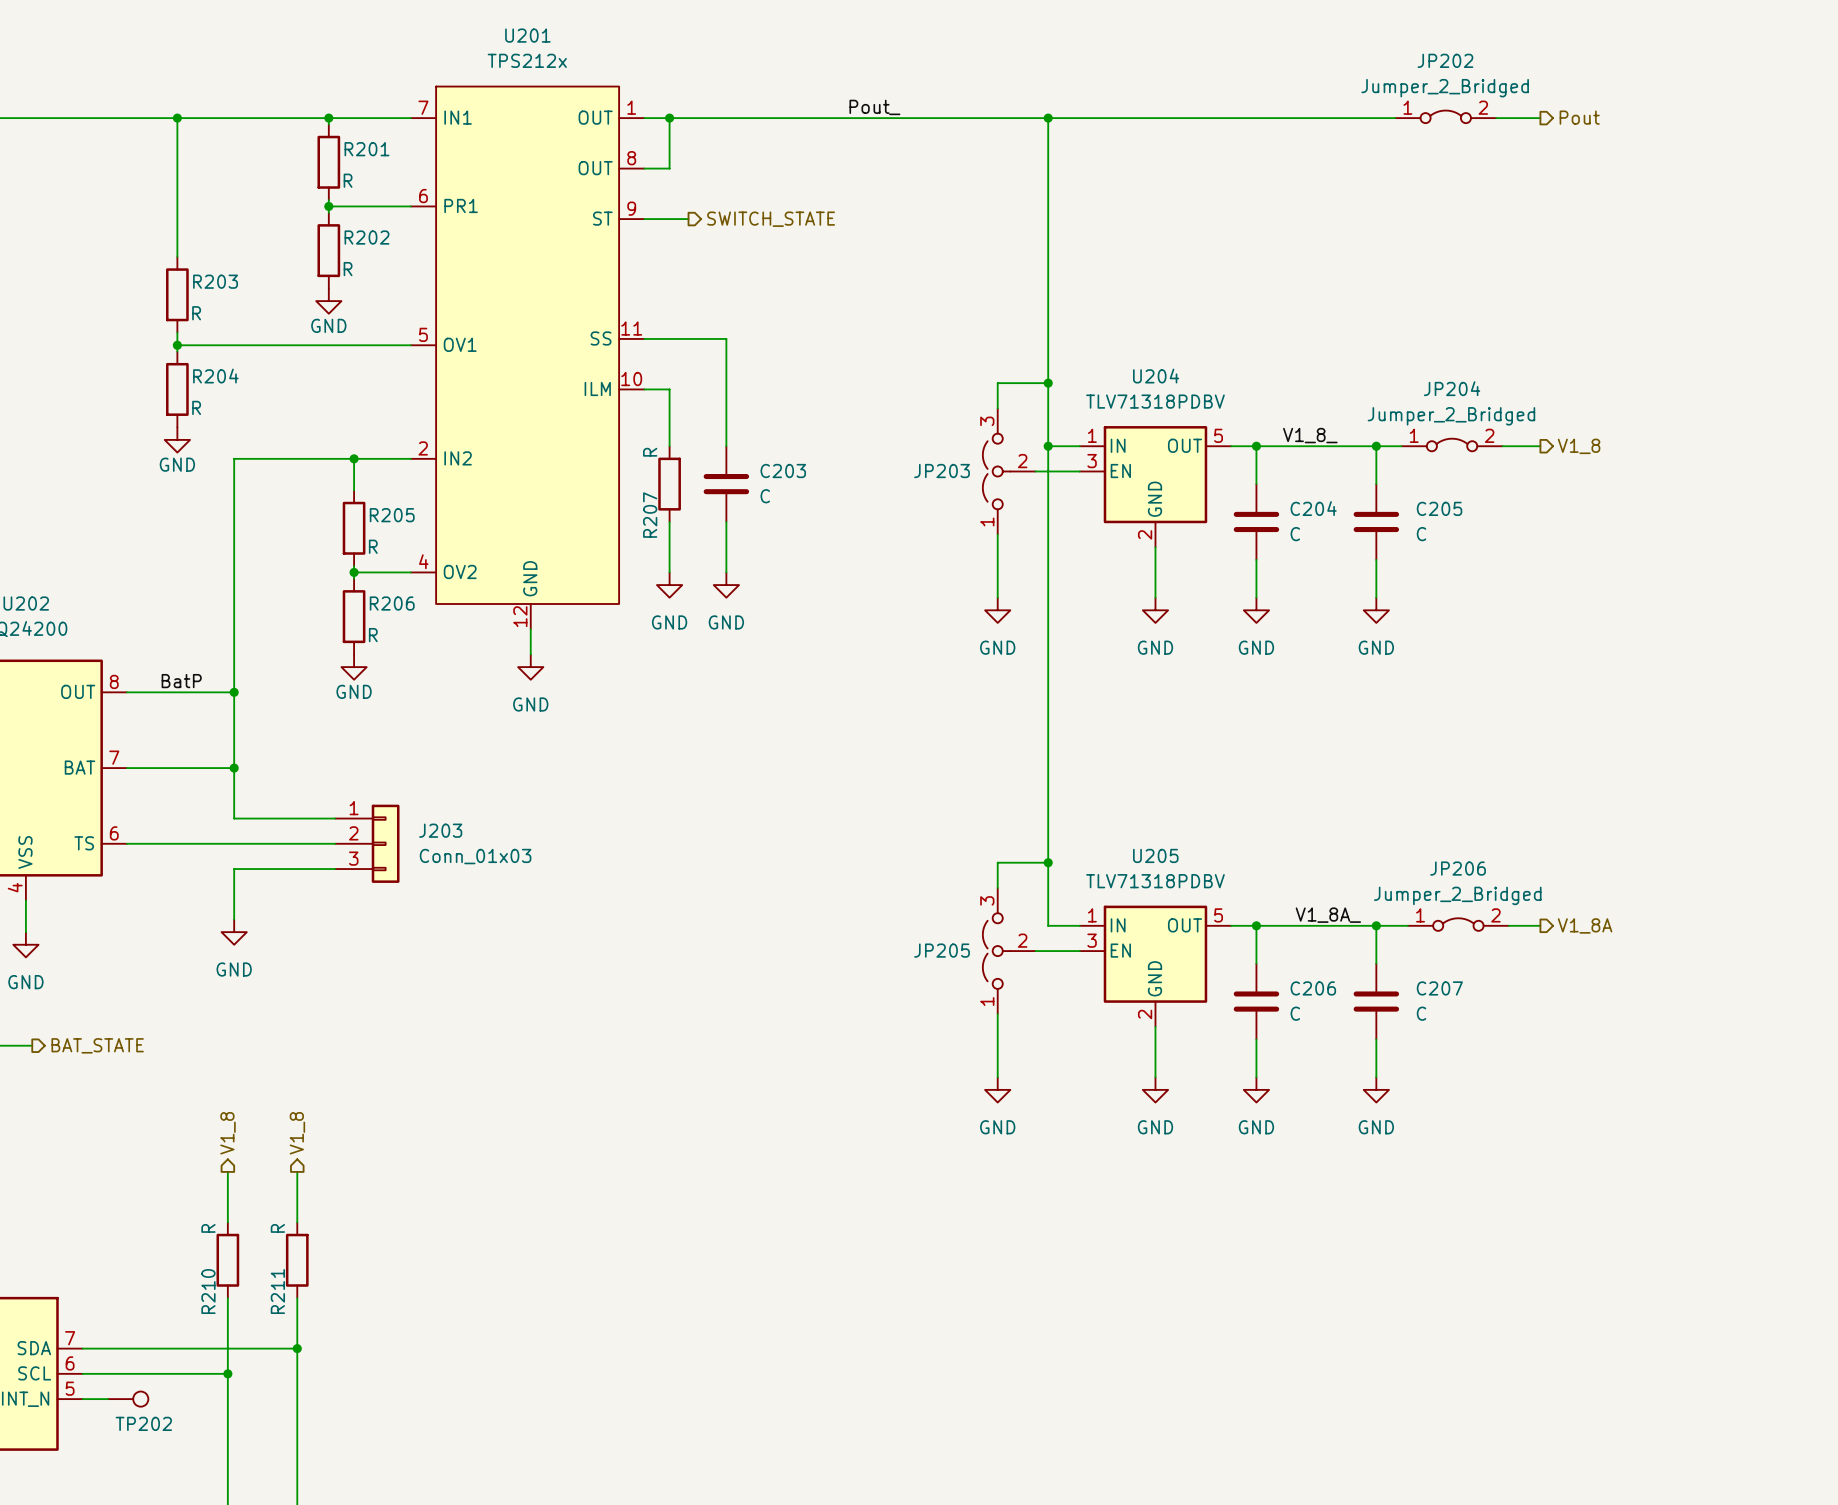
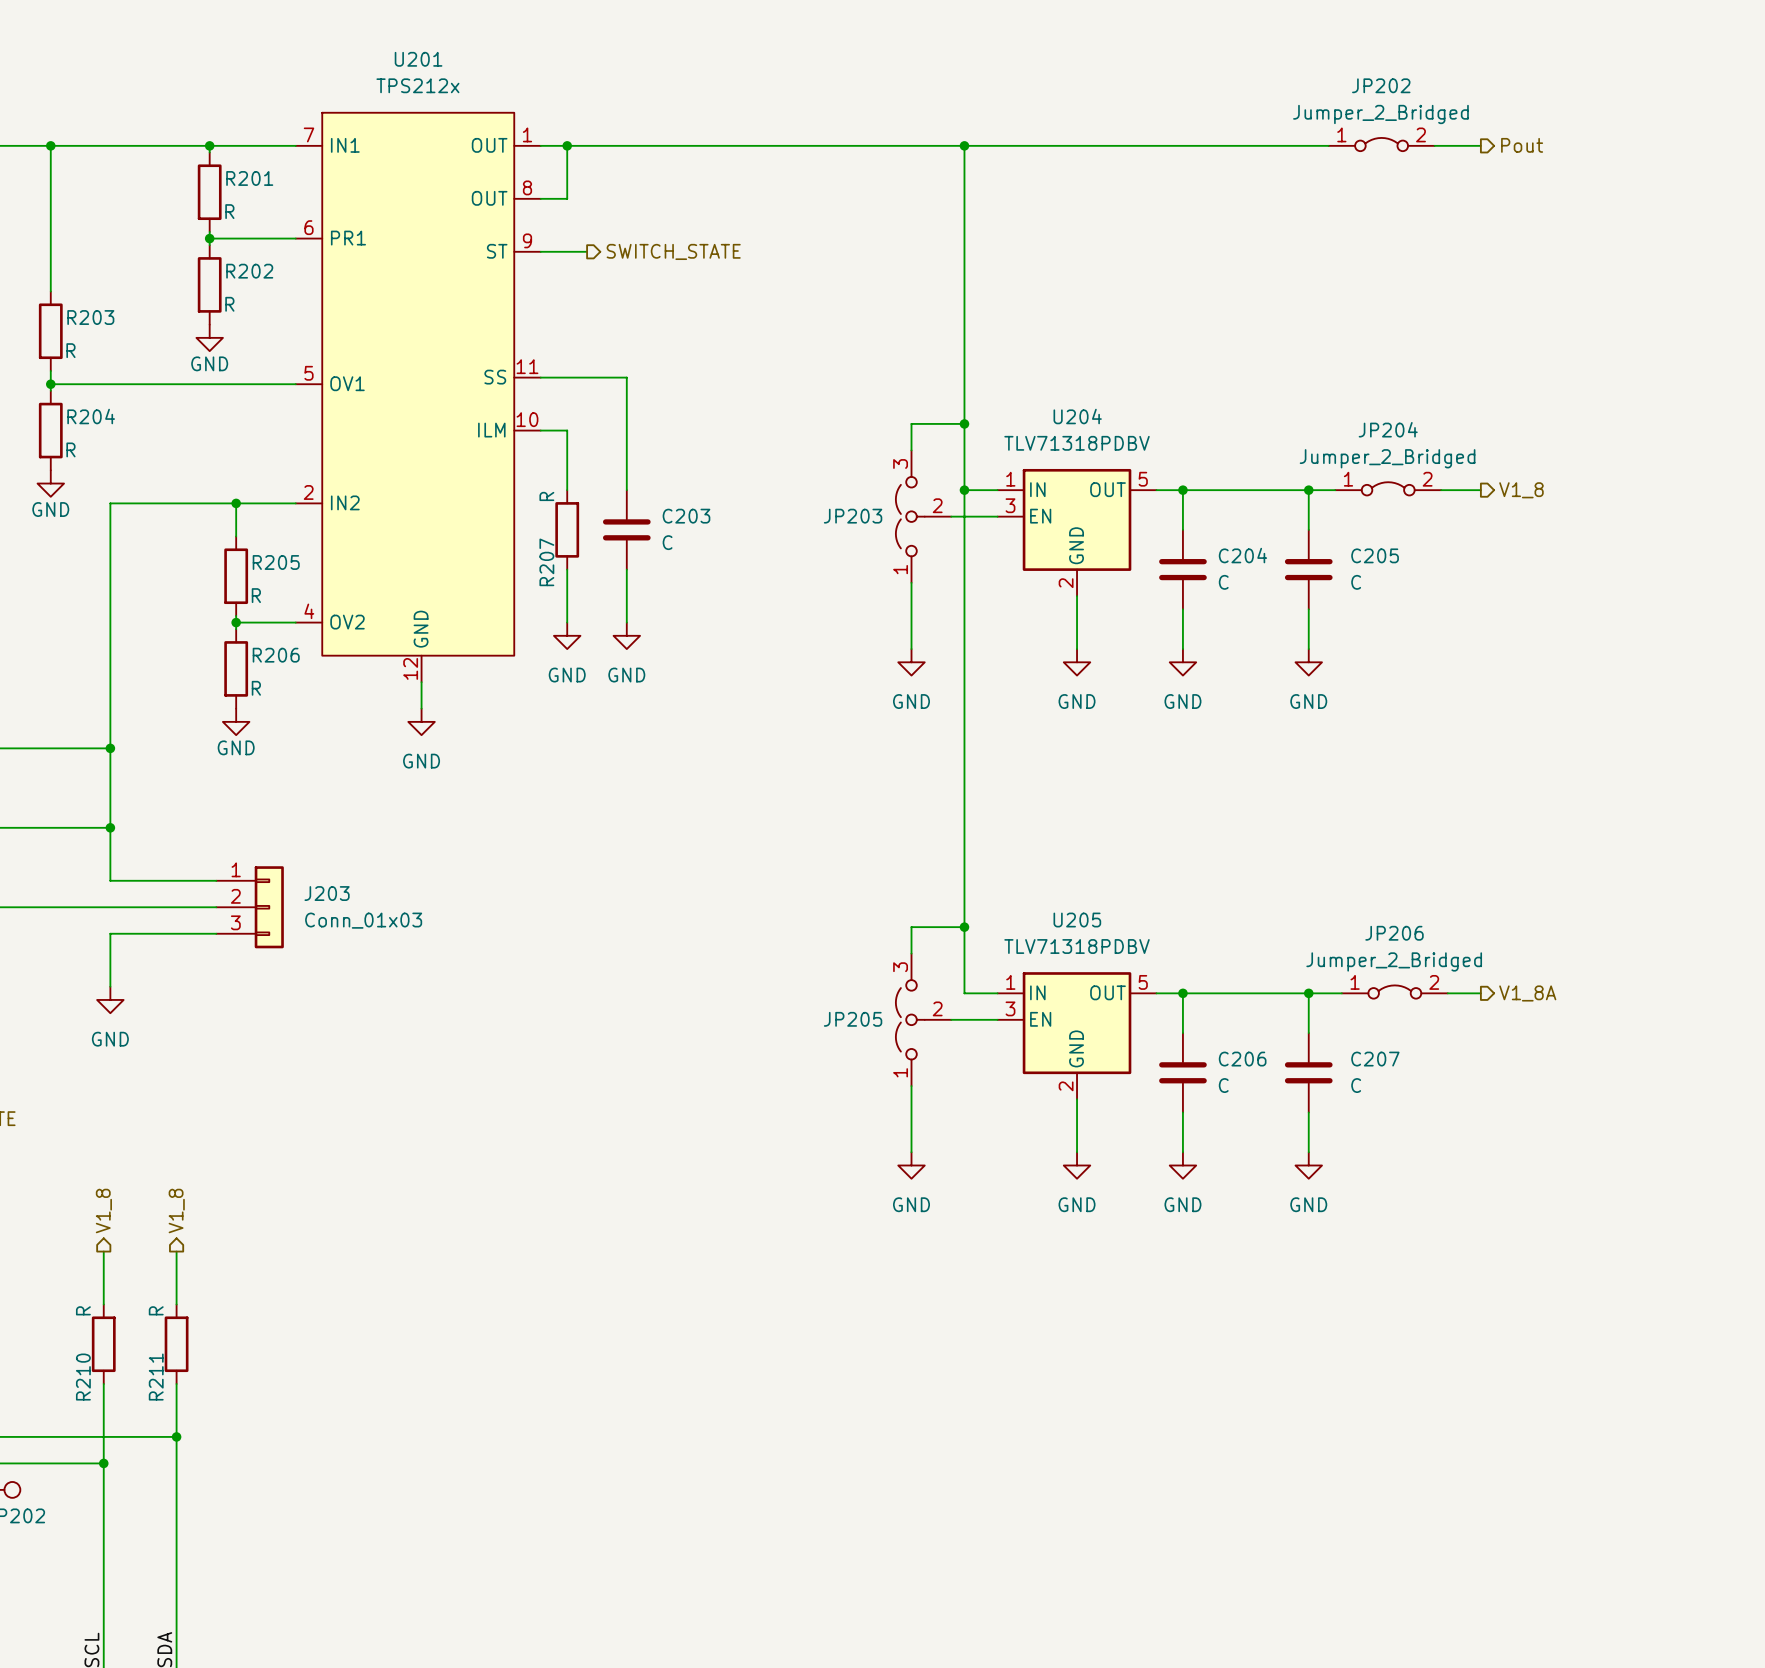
label: Pout_ (874, 107) -> none
label: V1_8_ (1310, 435) -> none
label: BatP (181, 681) -> none
label: V1_8A_ (1328, 915) -> none

